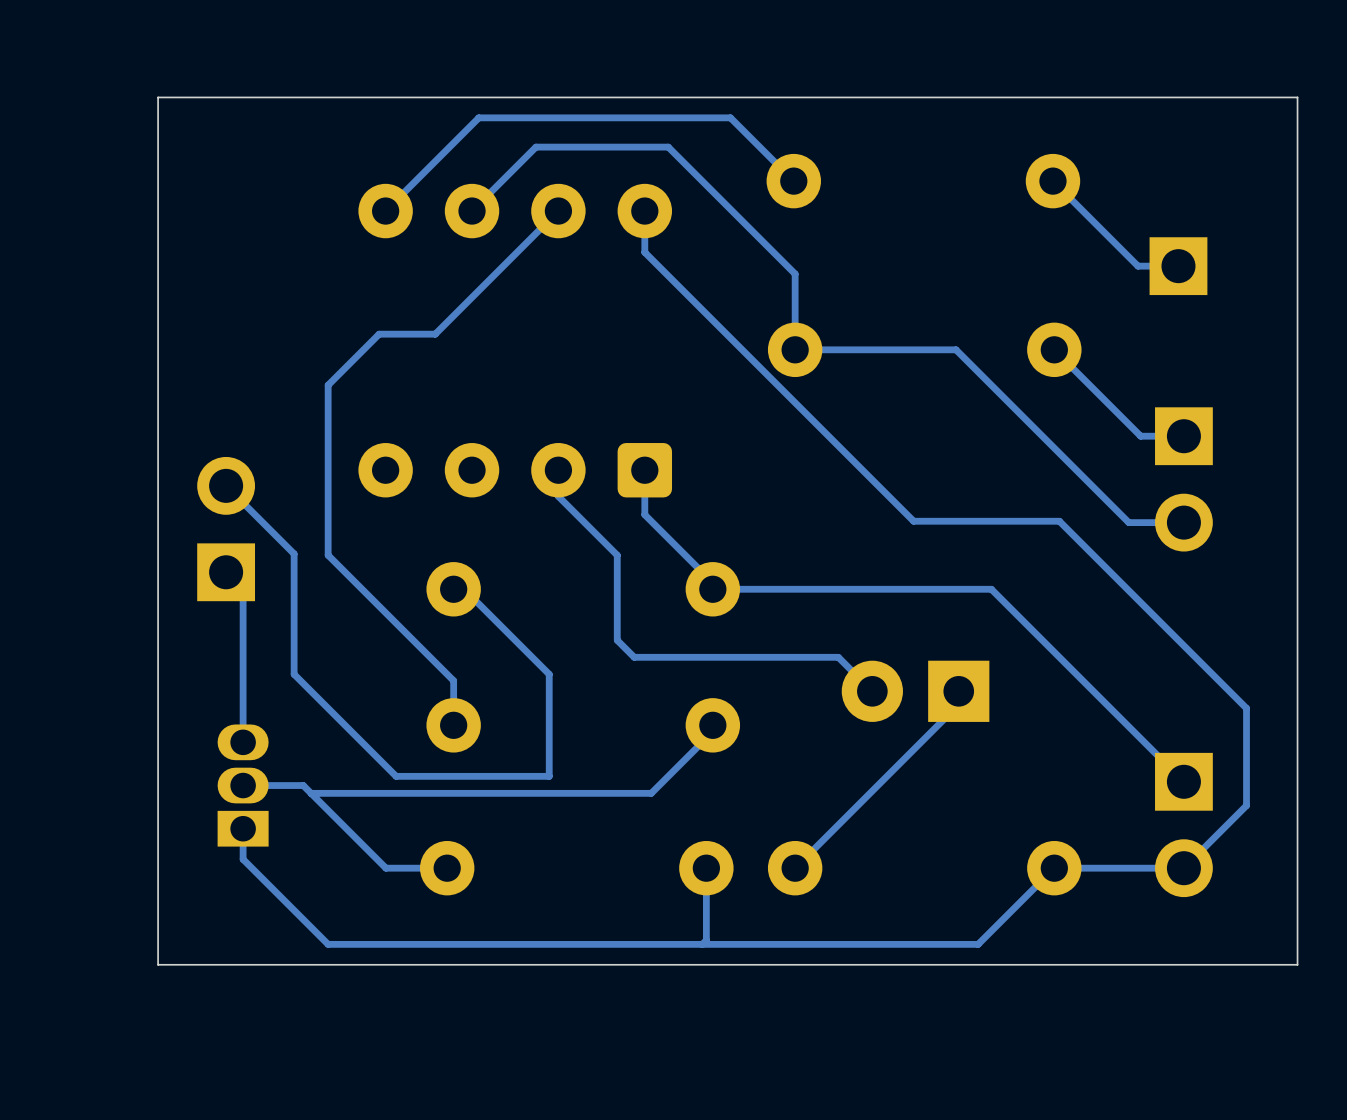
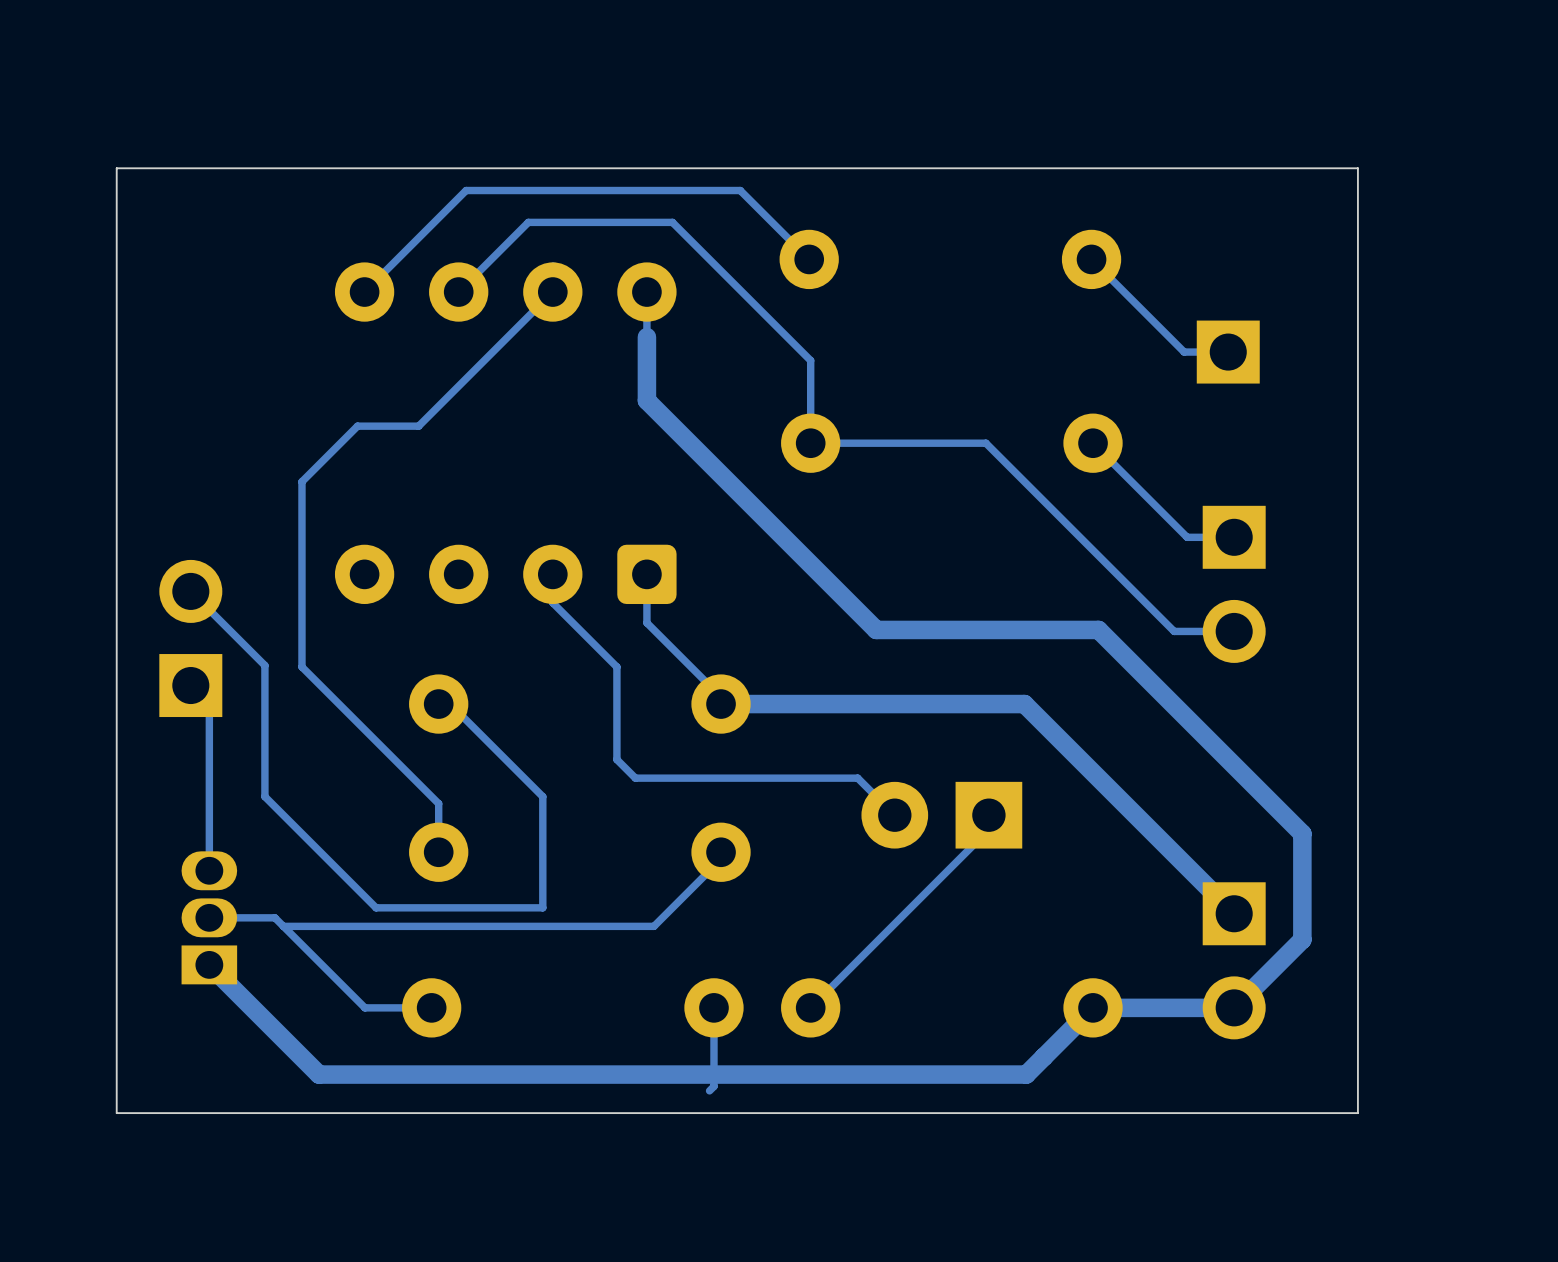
track: (644, 252) (913, 521) -> (646, 337) (646, 400) (876, 629) (939, 629)
track width: thin (913, 521) (1059, 521) (1246, 708) (1246, 805) (1183, 868) (1054, 868) (993, 929) -> thick (939, 629) (1098, 629) (1302, 833) (1302, 939) (1234, 1007) (1093, 1007) (1026, 1074)
track width: thin (712, 589) (991, 589) (1183, 781) -> thick (721, 704) (1024, 704) (1234, 913)
track: (243, 828) (243, 859) (328, 944) (978, 944) (993, 929) -> (209, 964) (319, 1074) (1026, 1074)

